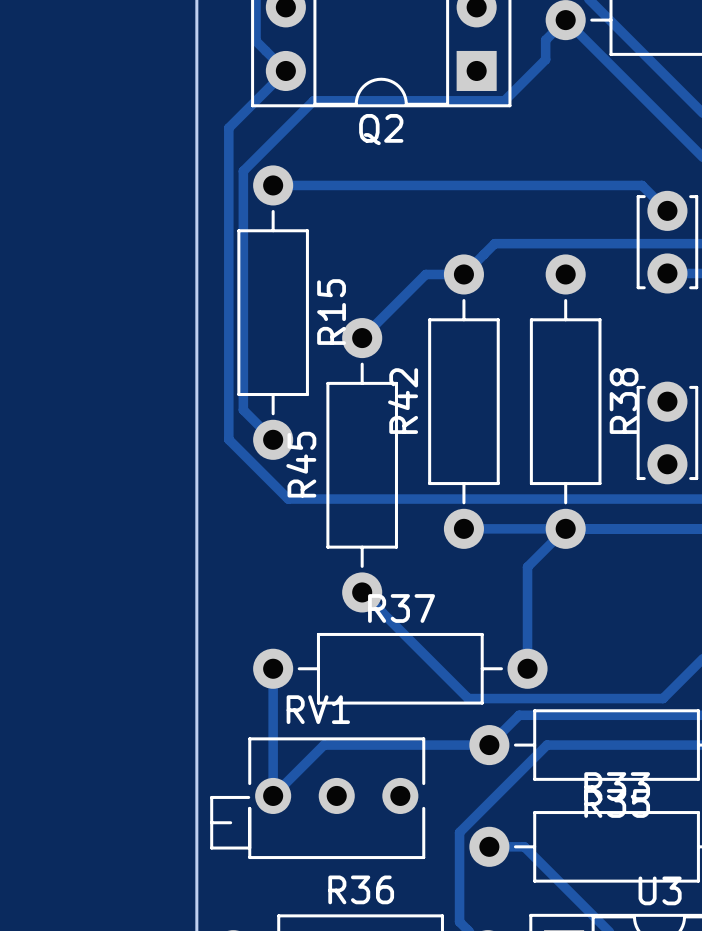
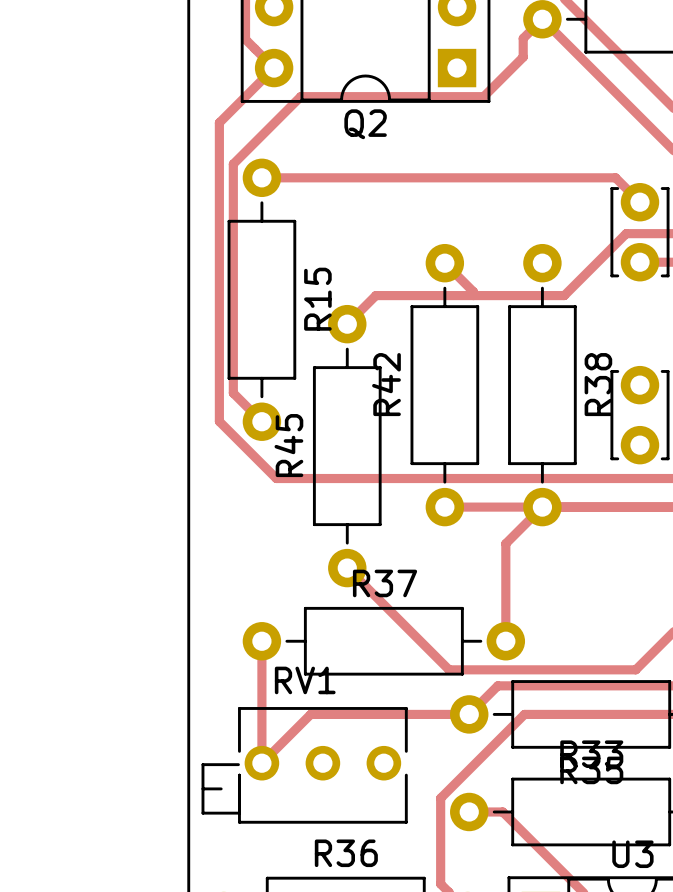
track: (653, 243) (494, 243) (463, 274) (425, 274) (391, 308) -> (626, 233) (564, 295) (375, 295)
track: none -> (444, 263) (473, 291) (473, 295)

